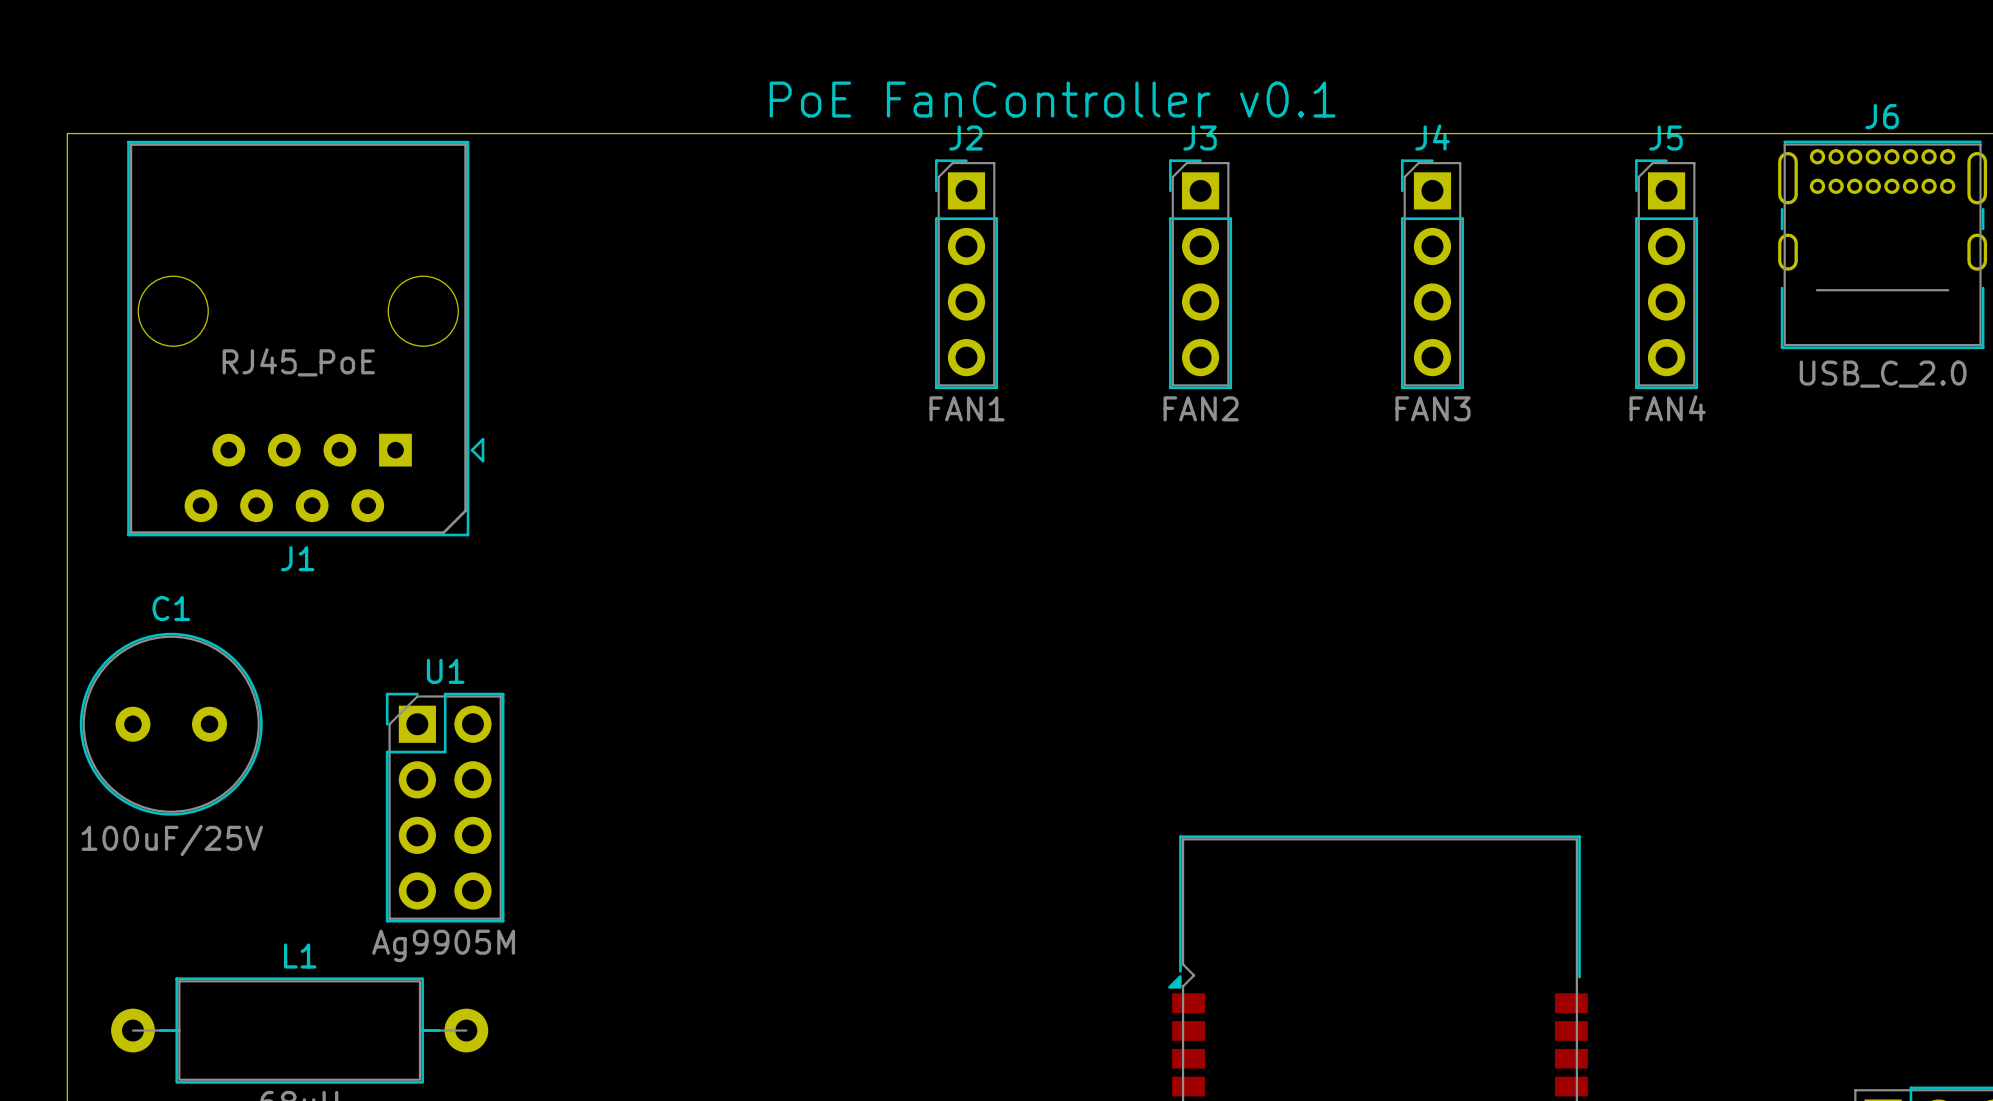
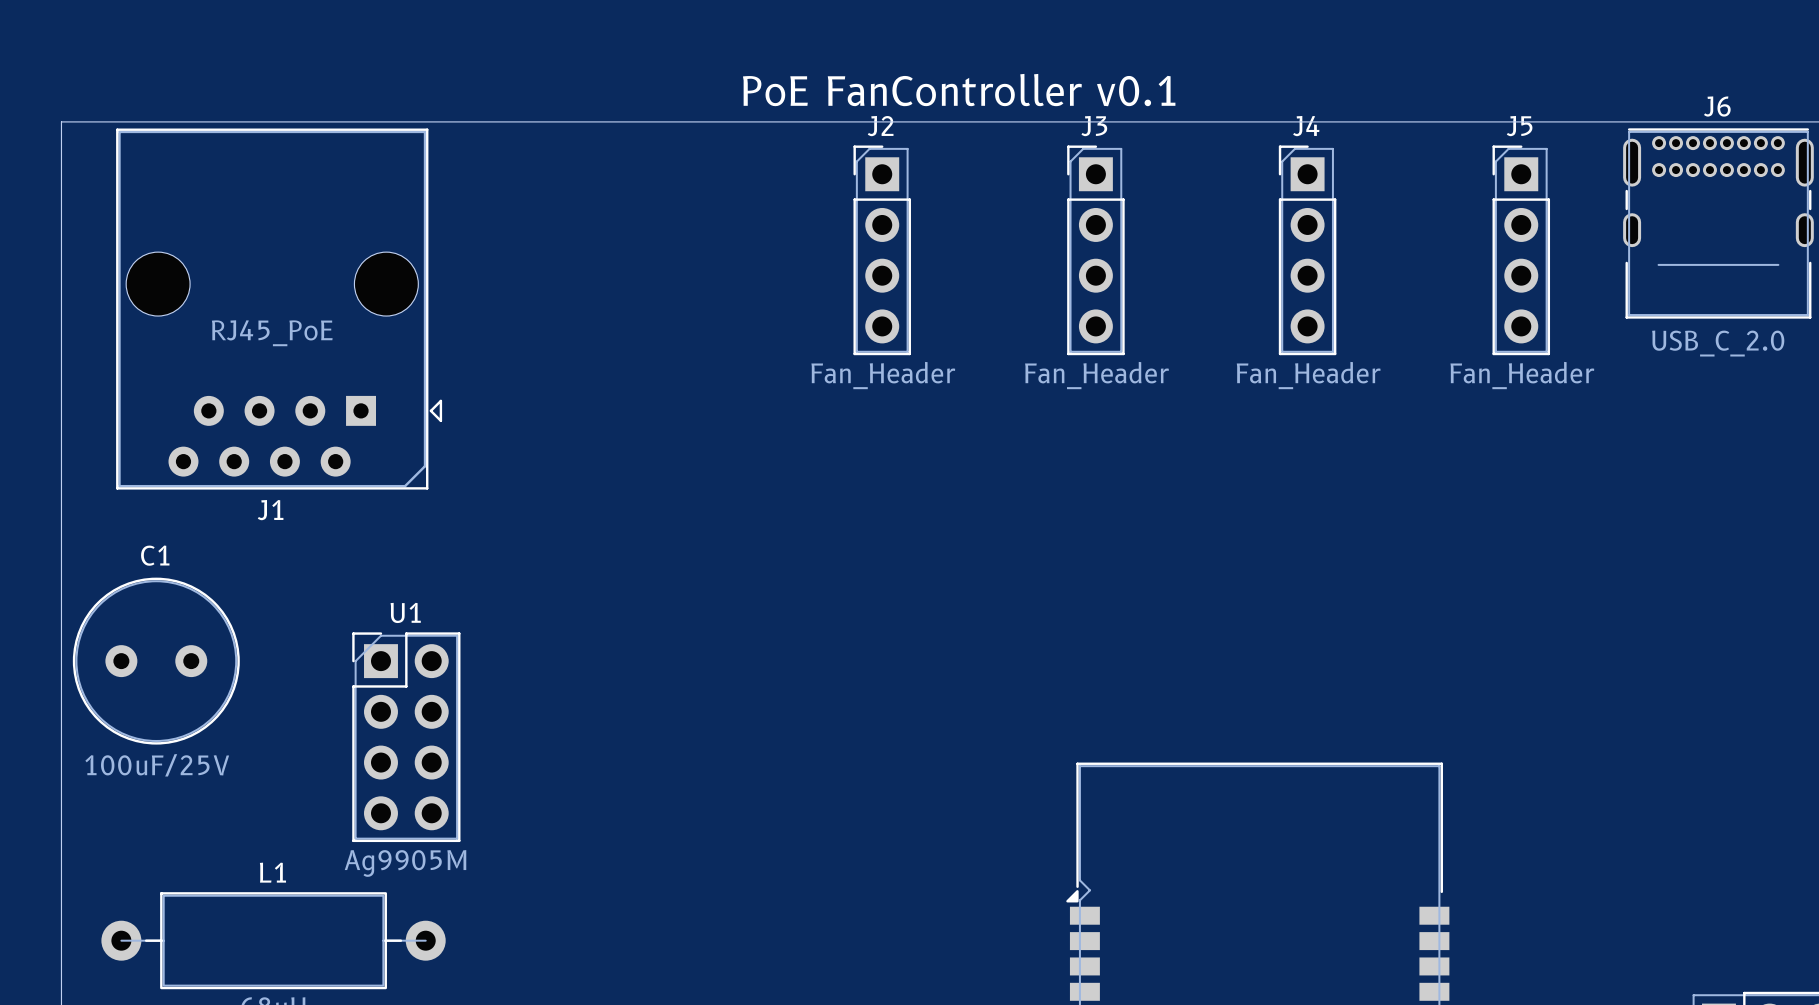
J2 value: FAN1 (967, 408) -> Fan_Header (883, 375)
J3 value: FAN2 (1201, 408) -> Fan_Header (1096, 375)
J4 value: FAN3 (1432, 408) -> Fan_Header (1308, 375)
J5 value: FAN4 (1667, 408) -> Fan_Header (1522, 375)

